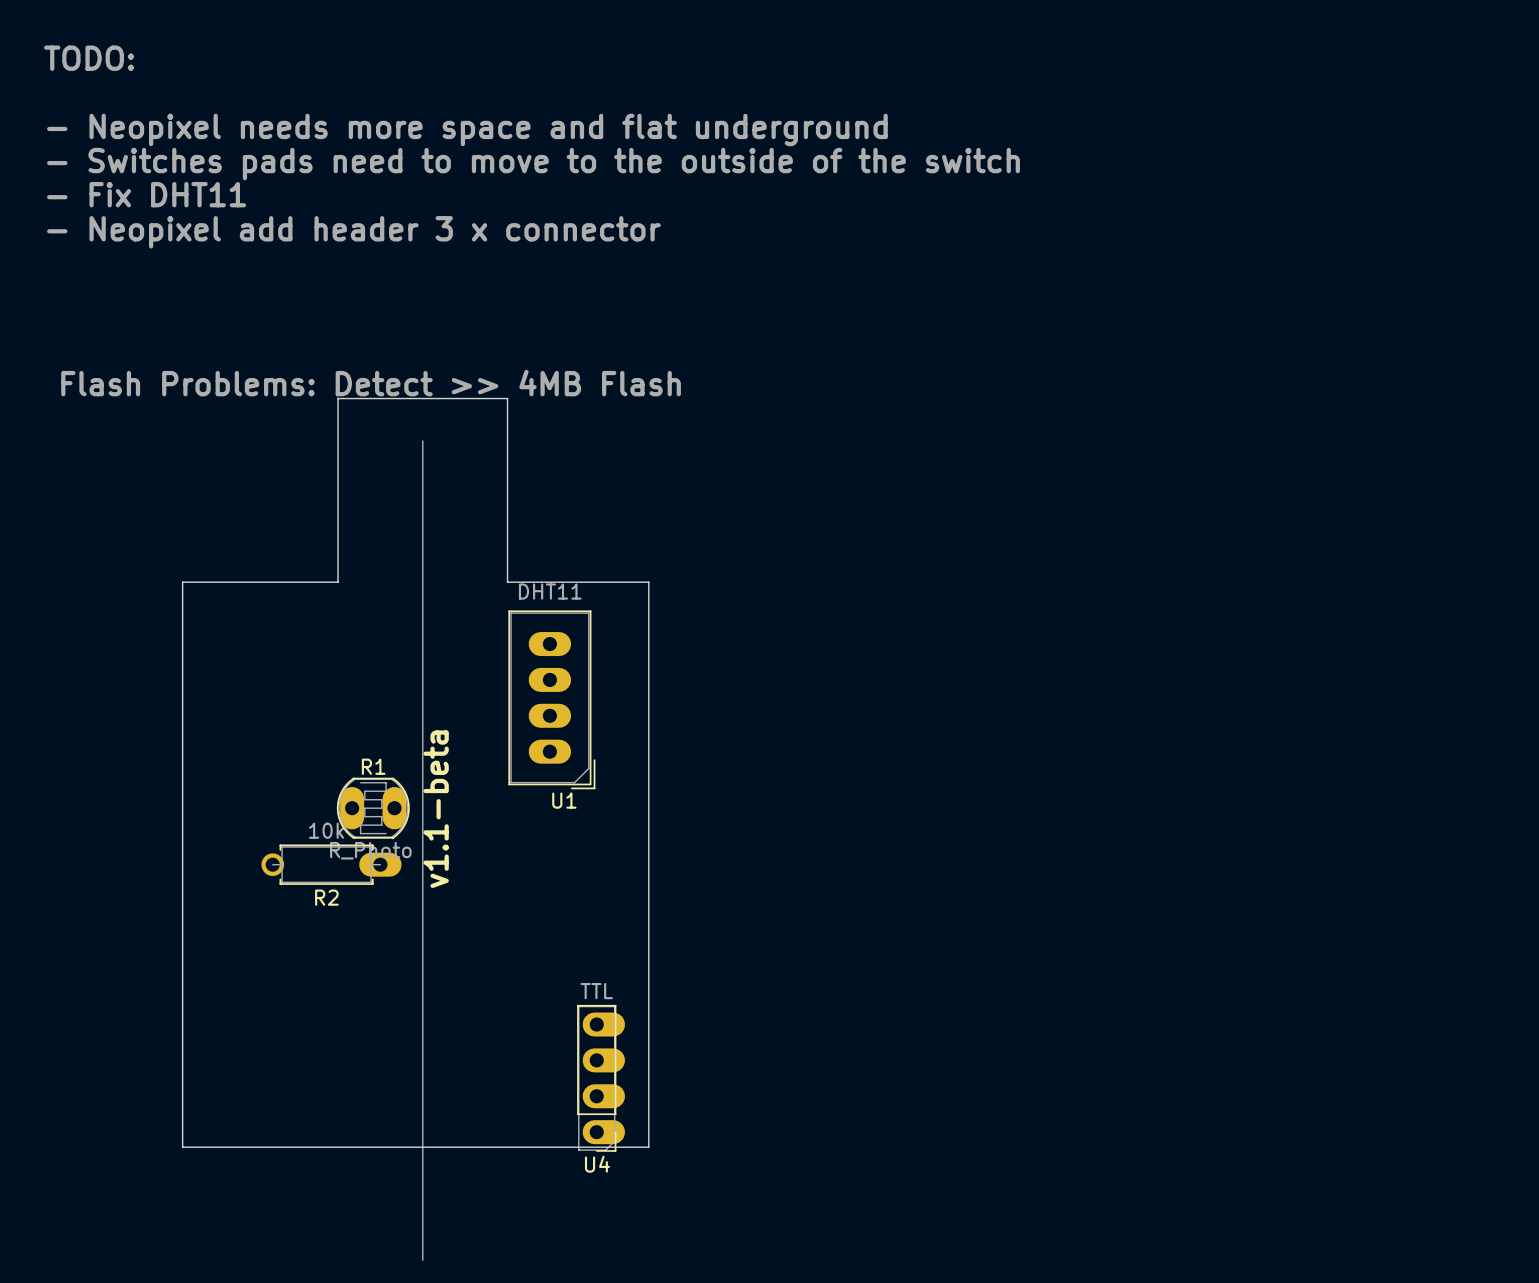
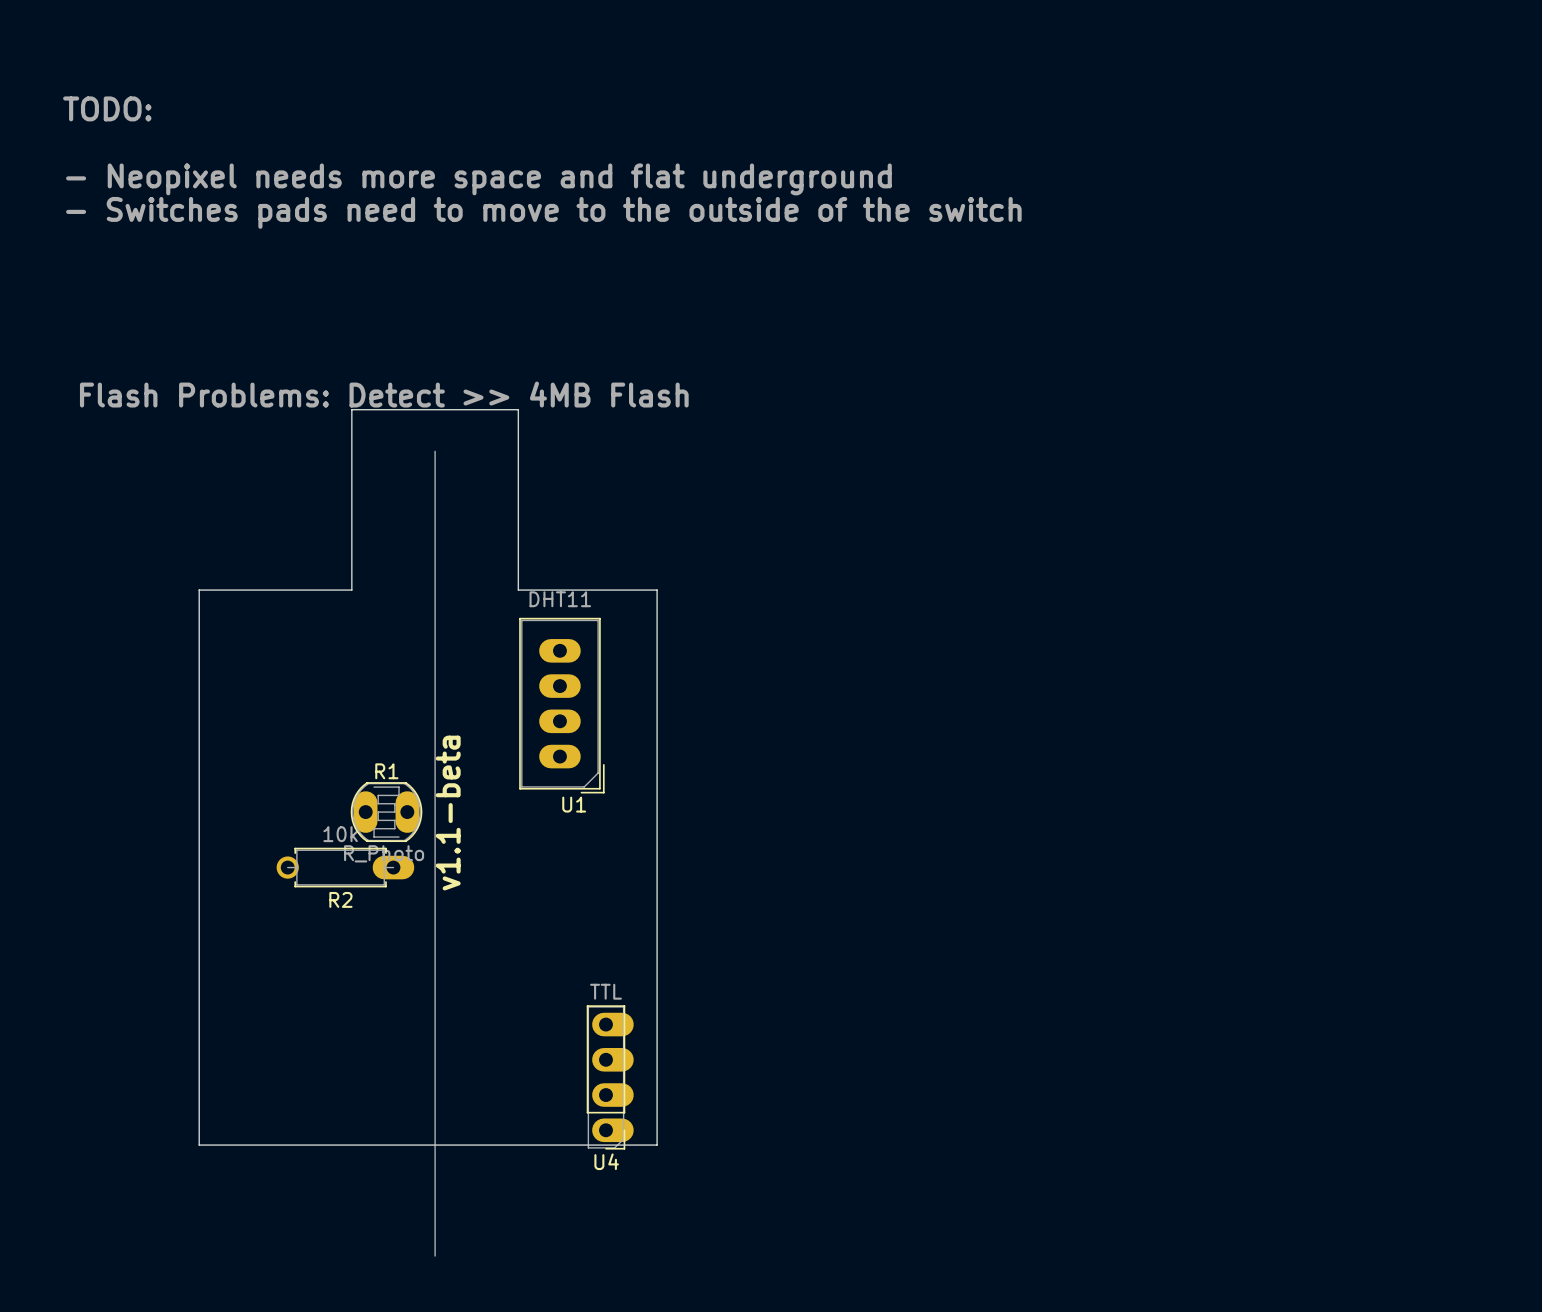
text position: TODO: (89, 58) -> TODO: (107, 108)
text: - Neopixel needs more space and flat underground (467, 129) -> none
text: - Switches pads need to move to the outside of the switch (533, 164) -> - Neopixel needs more space and flat underground (478, 179)
text: - Fix DHT11 (146, 194) -> - Switches pads need to move to the outside of the switch (543, 212)
text: - Neopixel add header 3 x connector (353, 232) -> none

